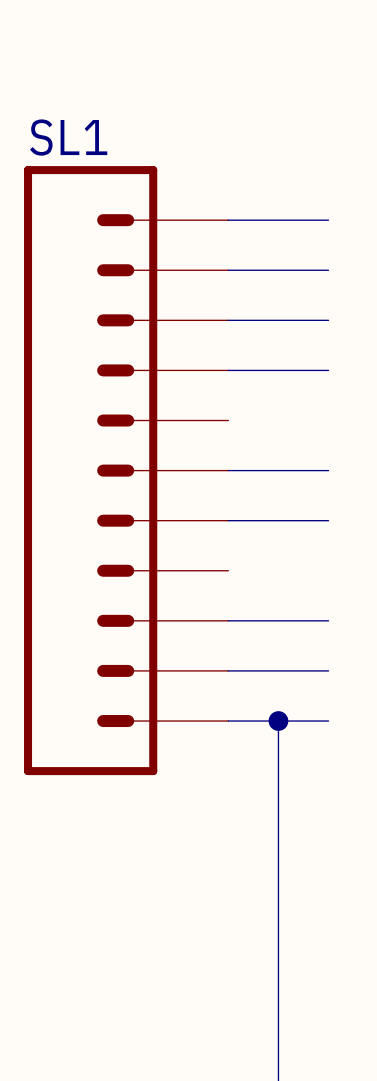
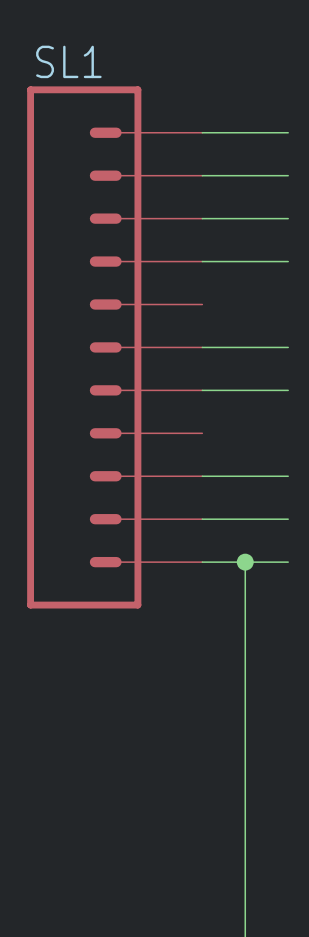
wire: none -> (202, 132) (288, 132)
wire: (228, 370) (328, 370) -> (202, 347) (288, 347)
SL1 position: (126, 470) -> (114, 347)
wire: (228, 520) (328, 520) -> (202, 476) (288, 476)
wire: none -> (245, 562) (245, 605)
wire: (228, 721) (328, 721) -> none
junction position: (278, 721) -> (245, 562)

